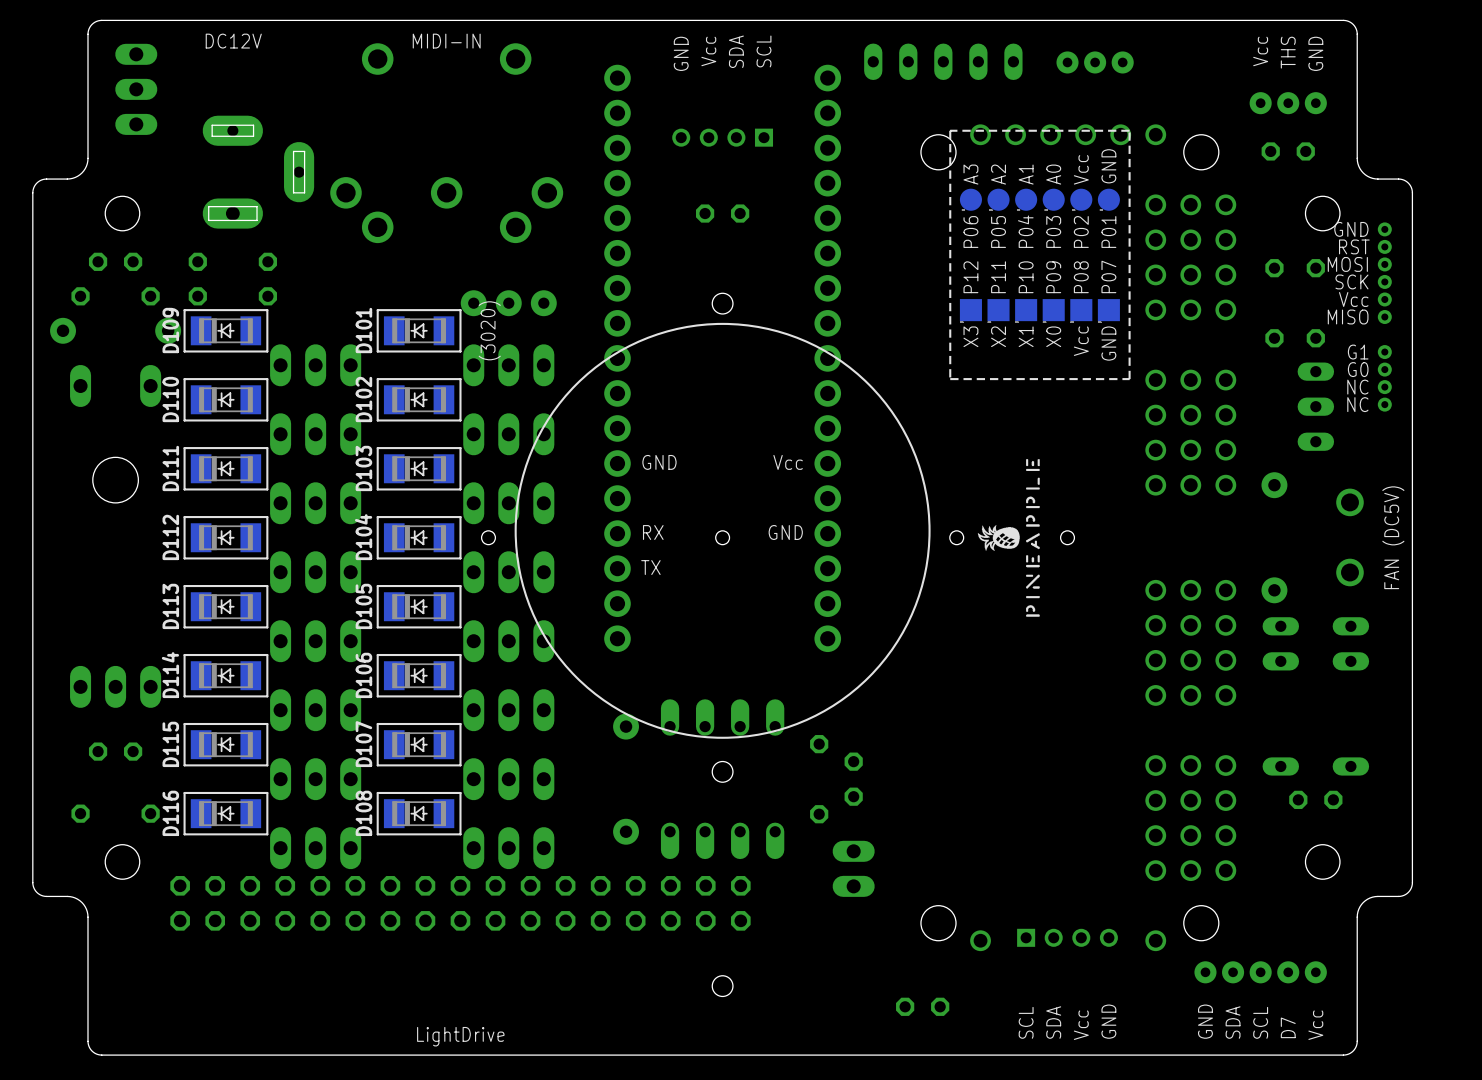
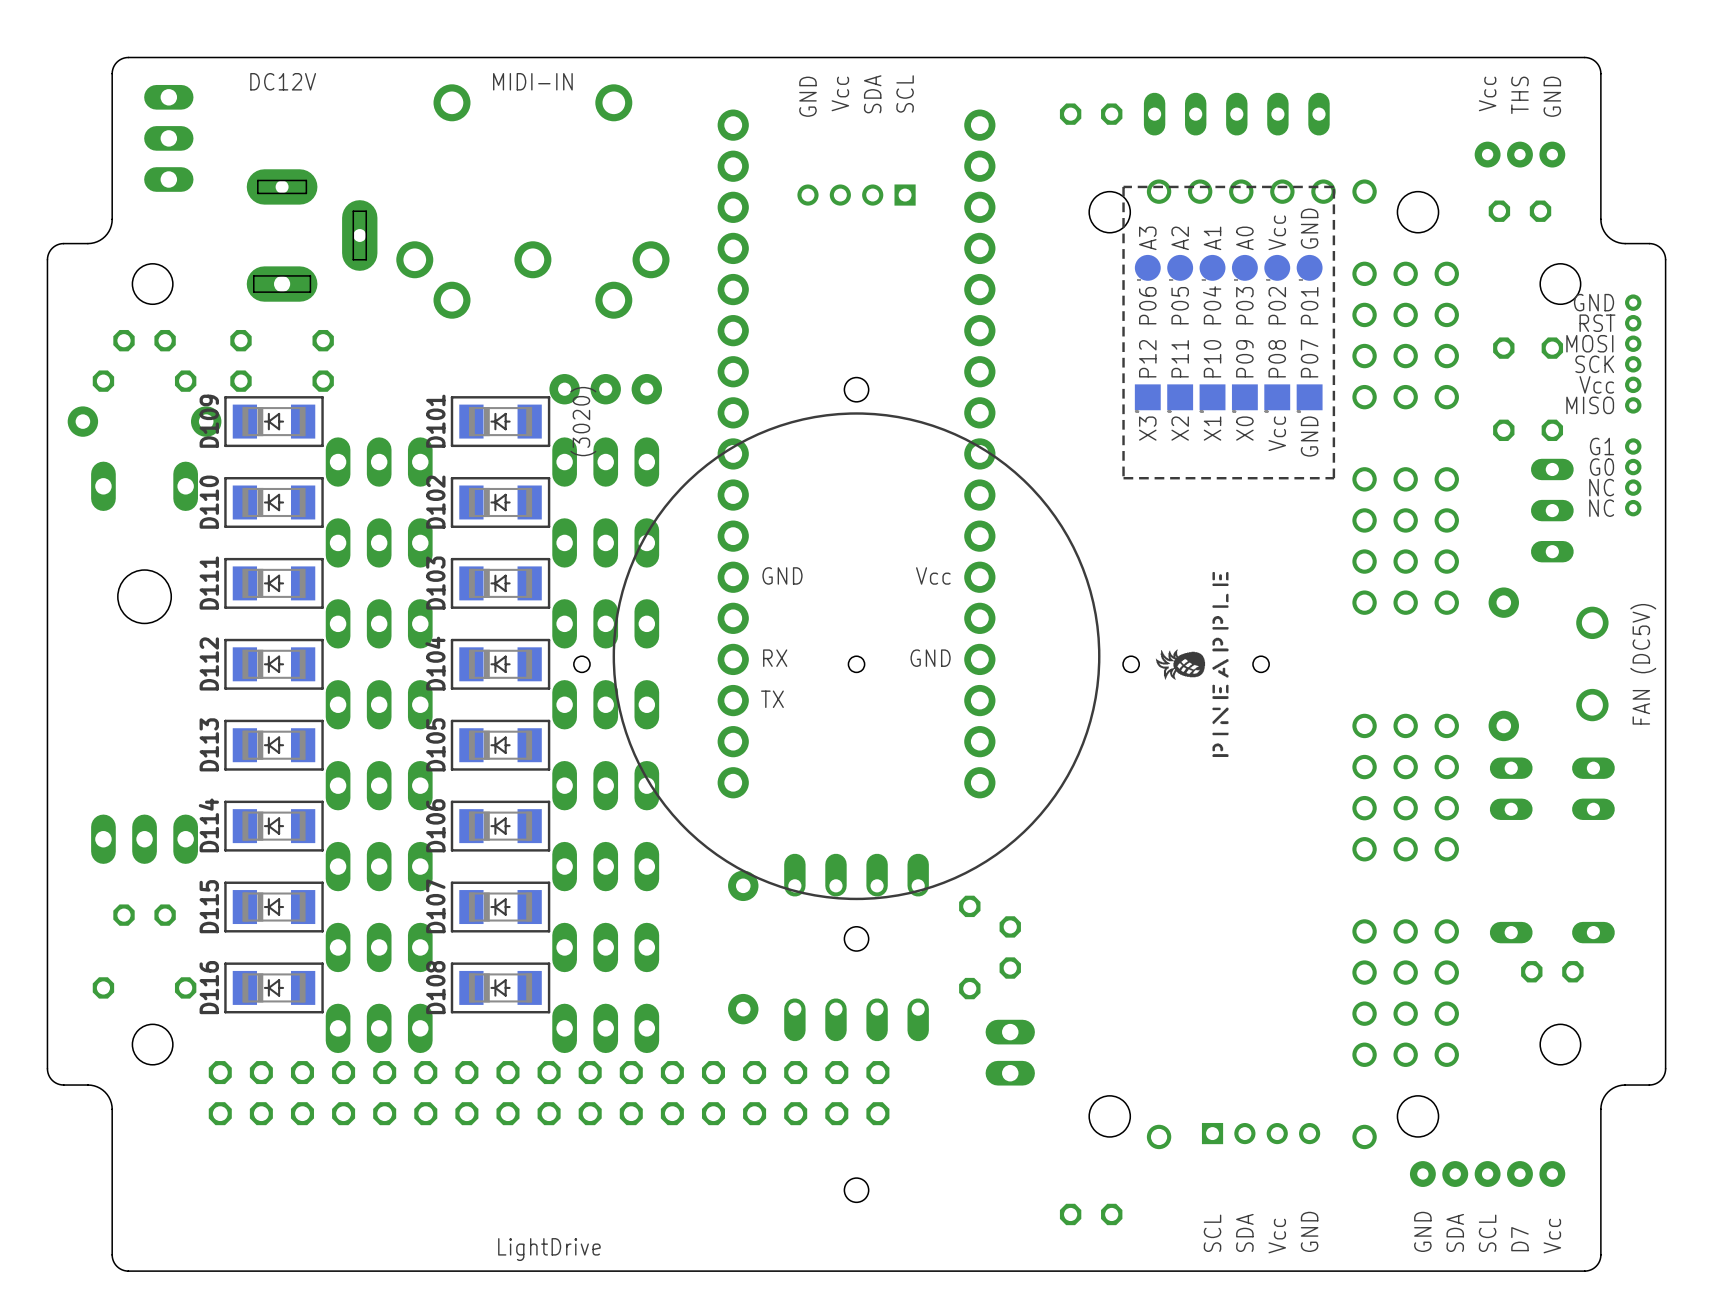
part position: (943, 61) -> (1236, 114)
part: (1095, 62) -> none
part position: (722, 213) -> (1091, 114)

